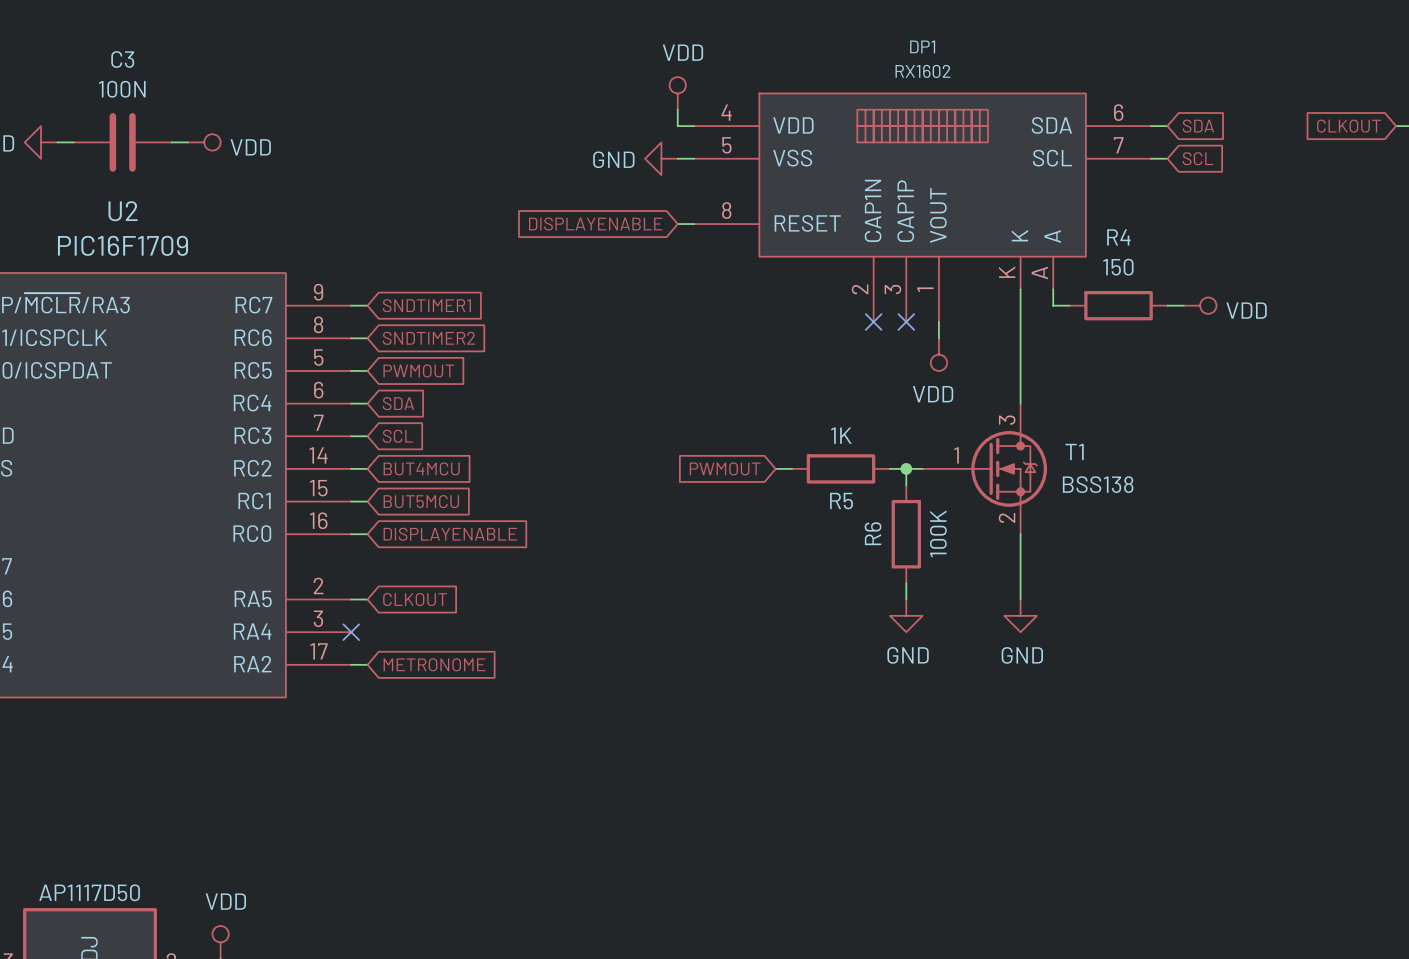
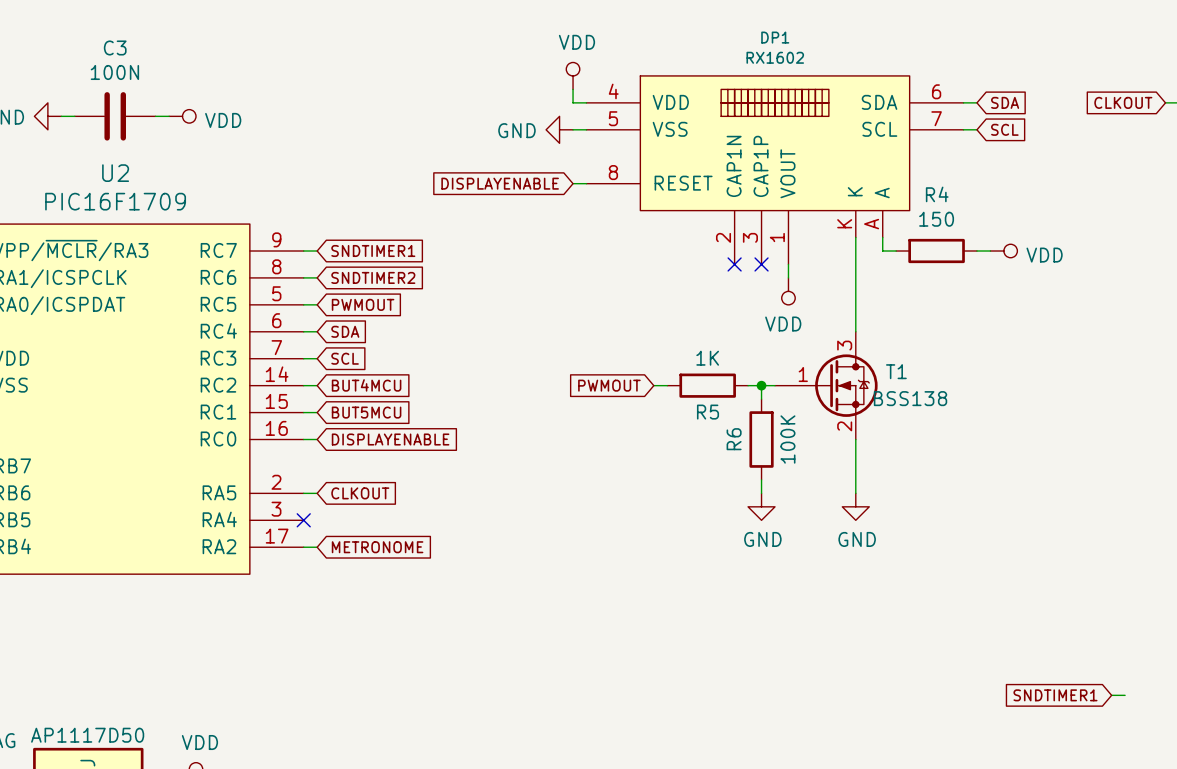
global label: none -> SNDTIMER1 (1055, 695)
wire: none -> (1111, 695) (1125, 695)

